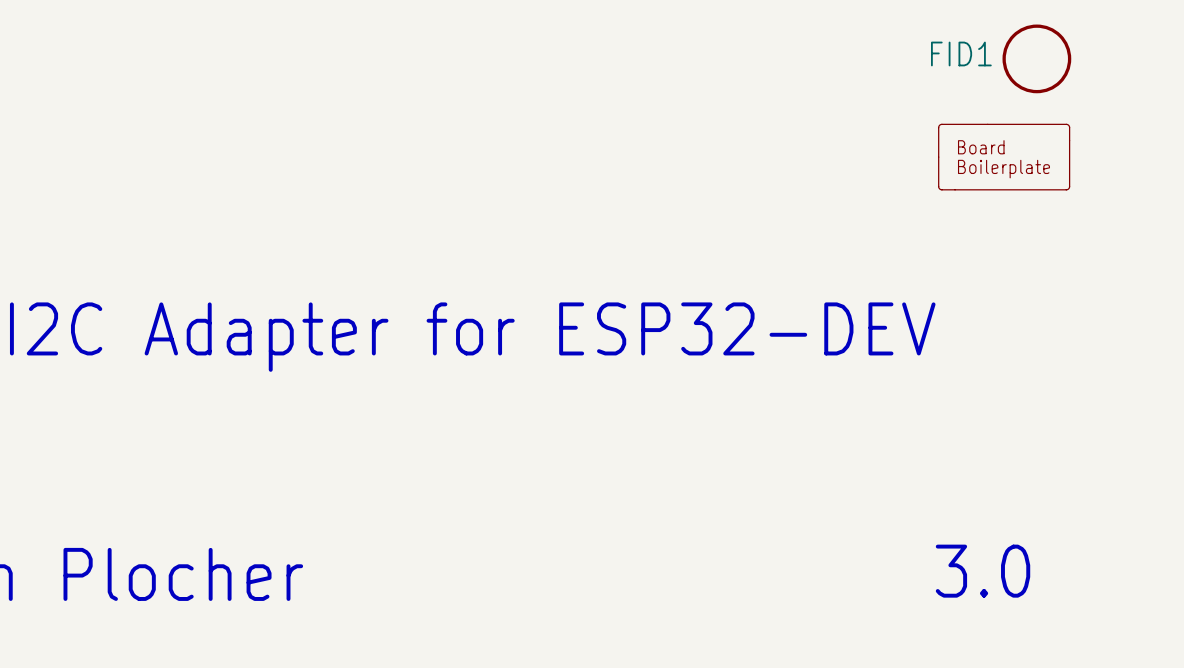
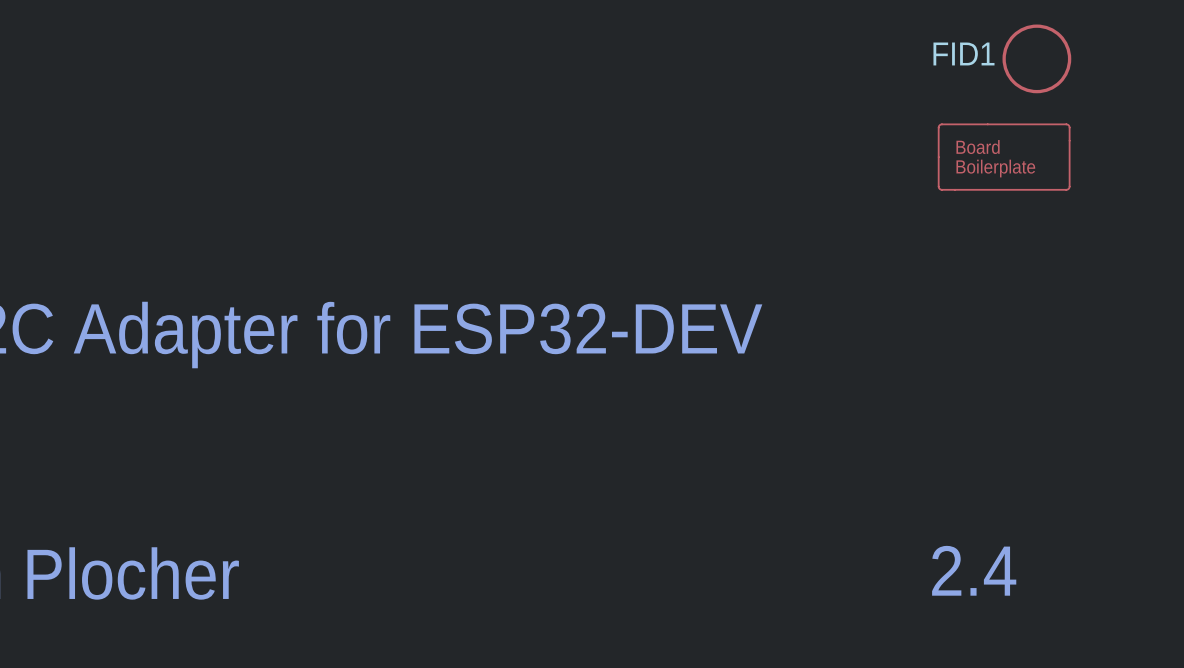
text: 3.0 (983, 571) -> 2.4 (974, 570)

